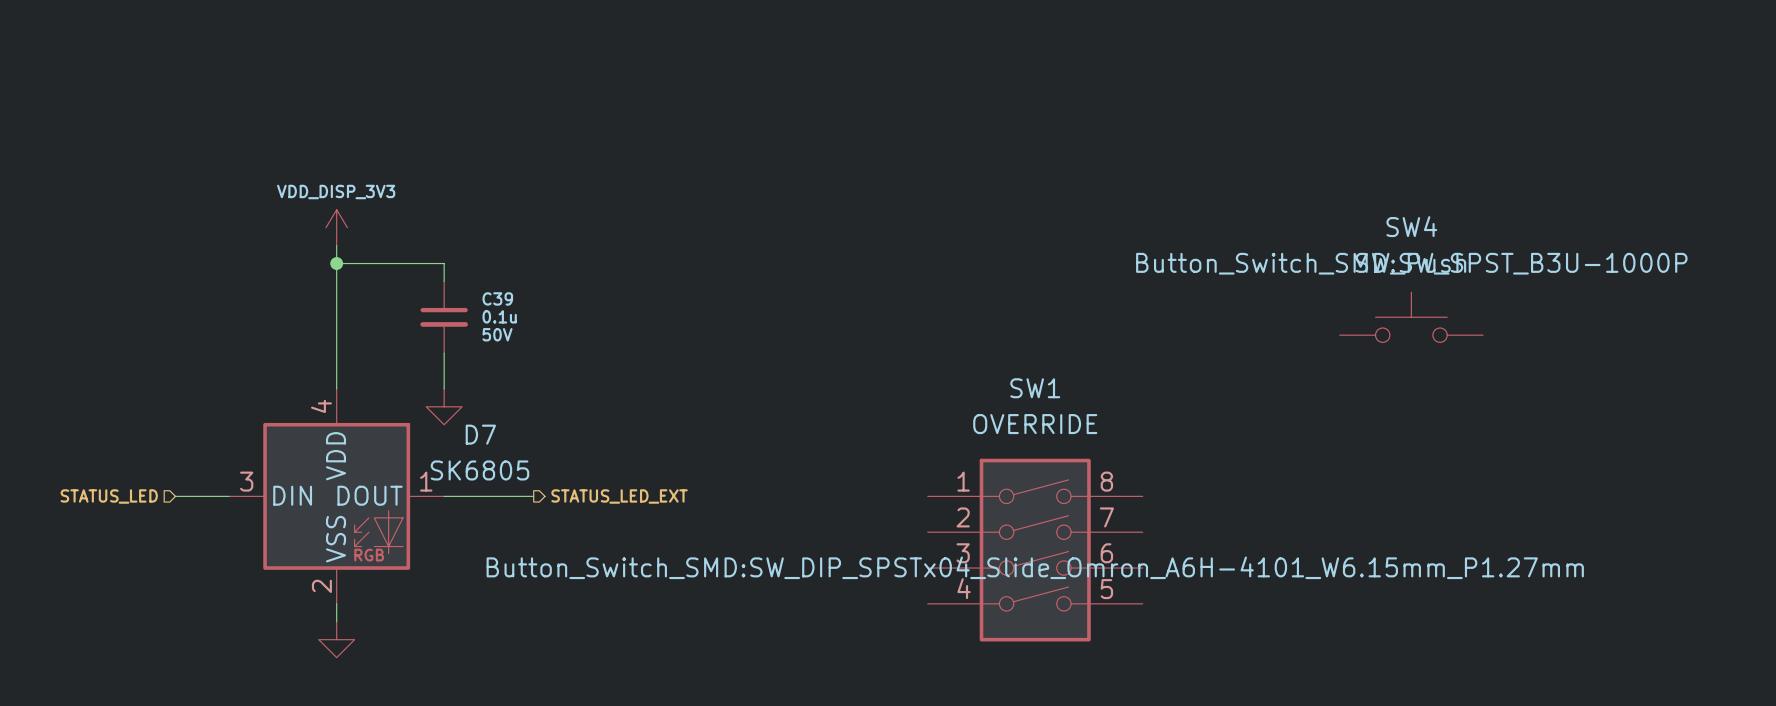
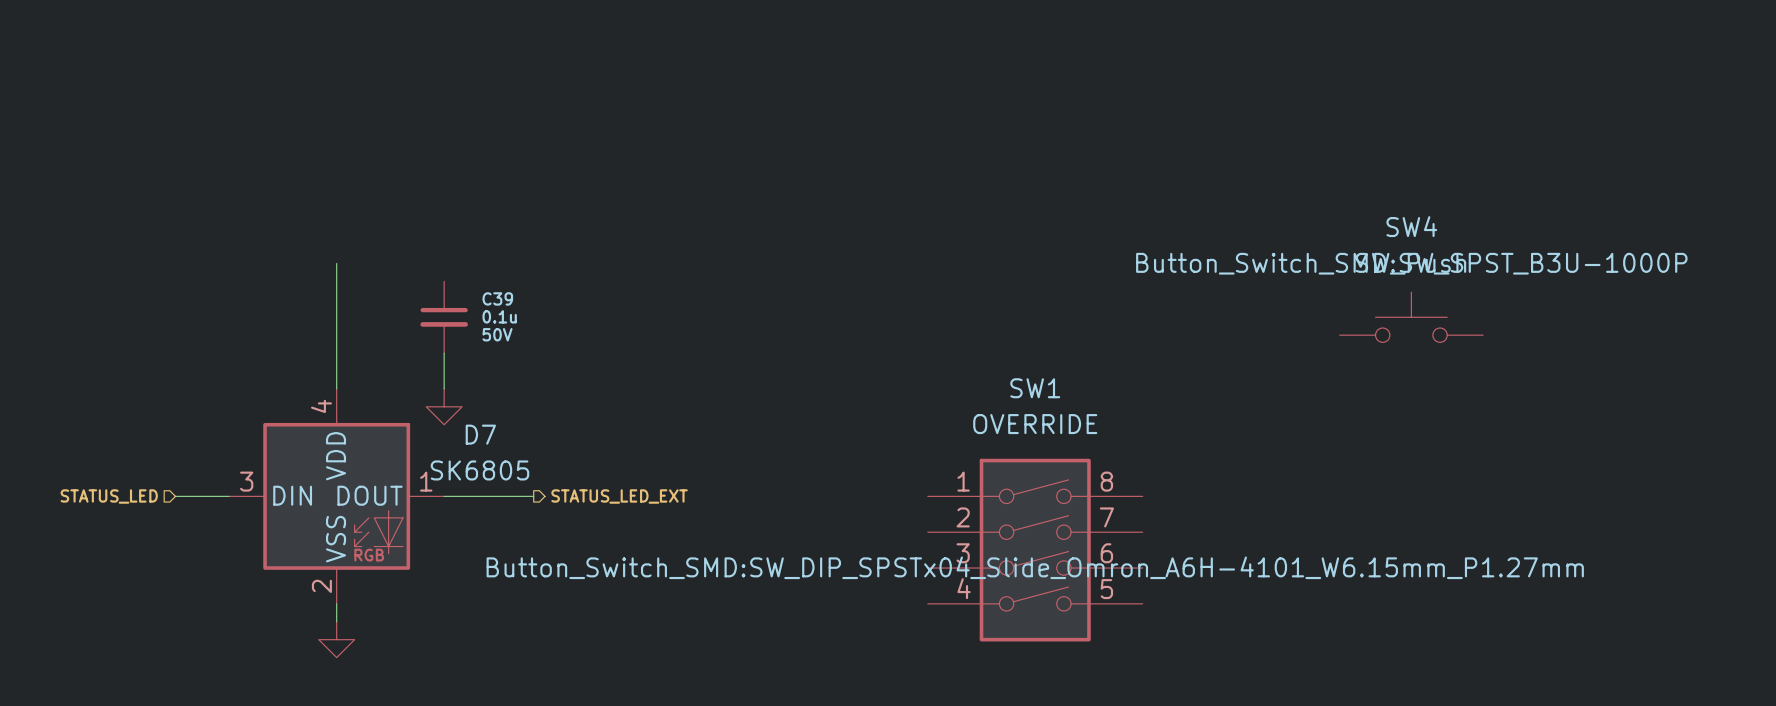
power symbol: VDD_DISP_3V3 (336, 227) -> none
wire: (336, 245) (336, 263) (444, 263) (444, 281) -> none
junction: (336, 263) -> none

